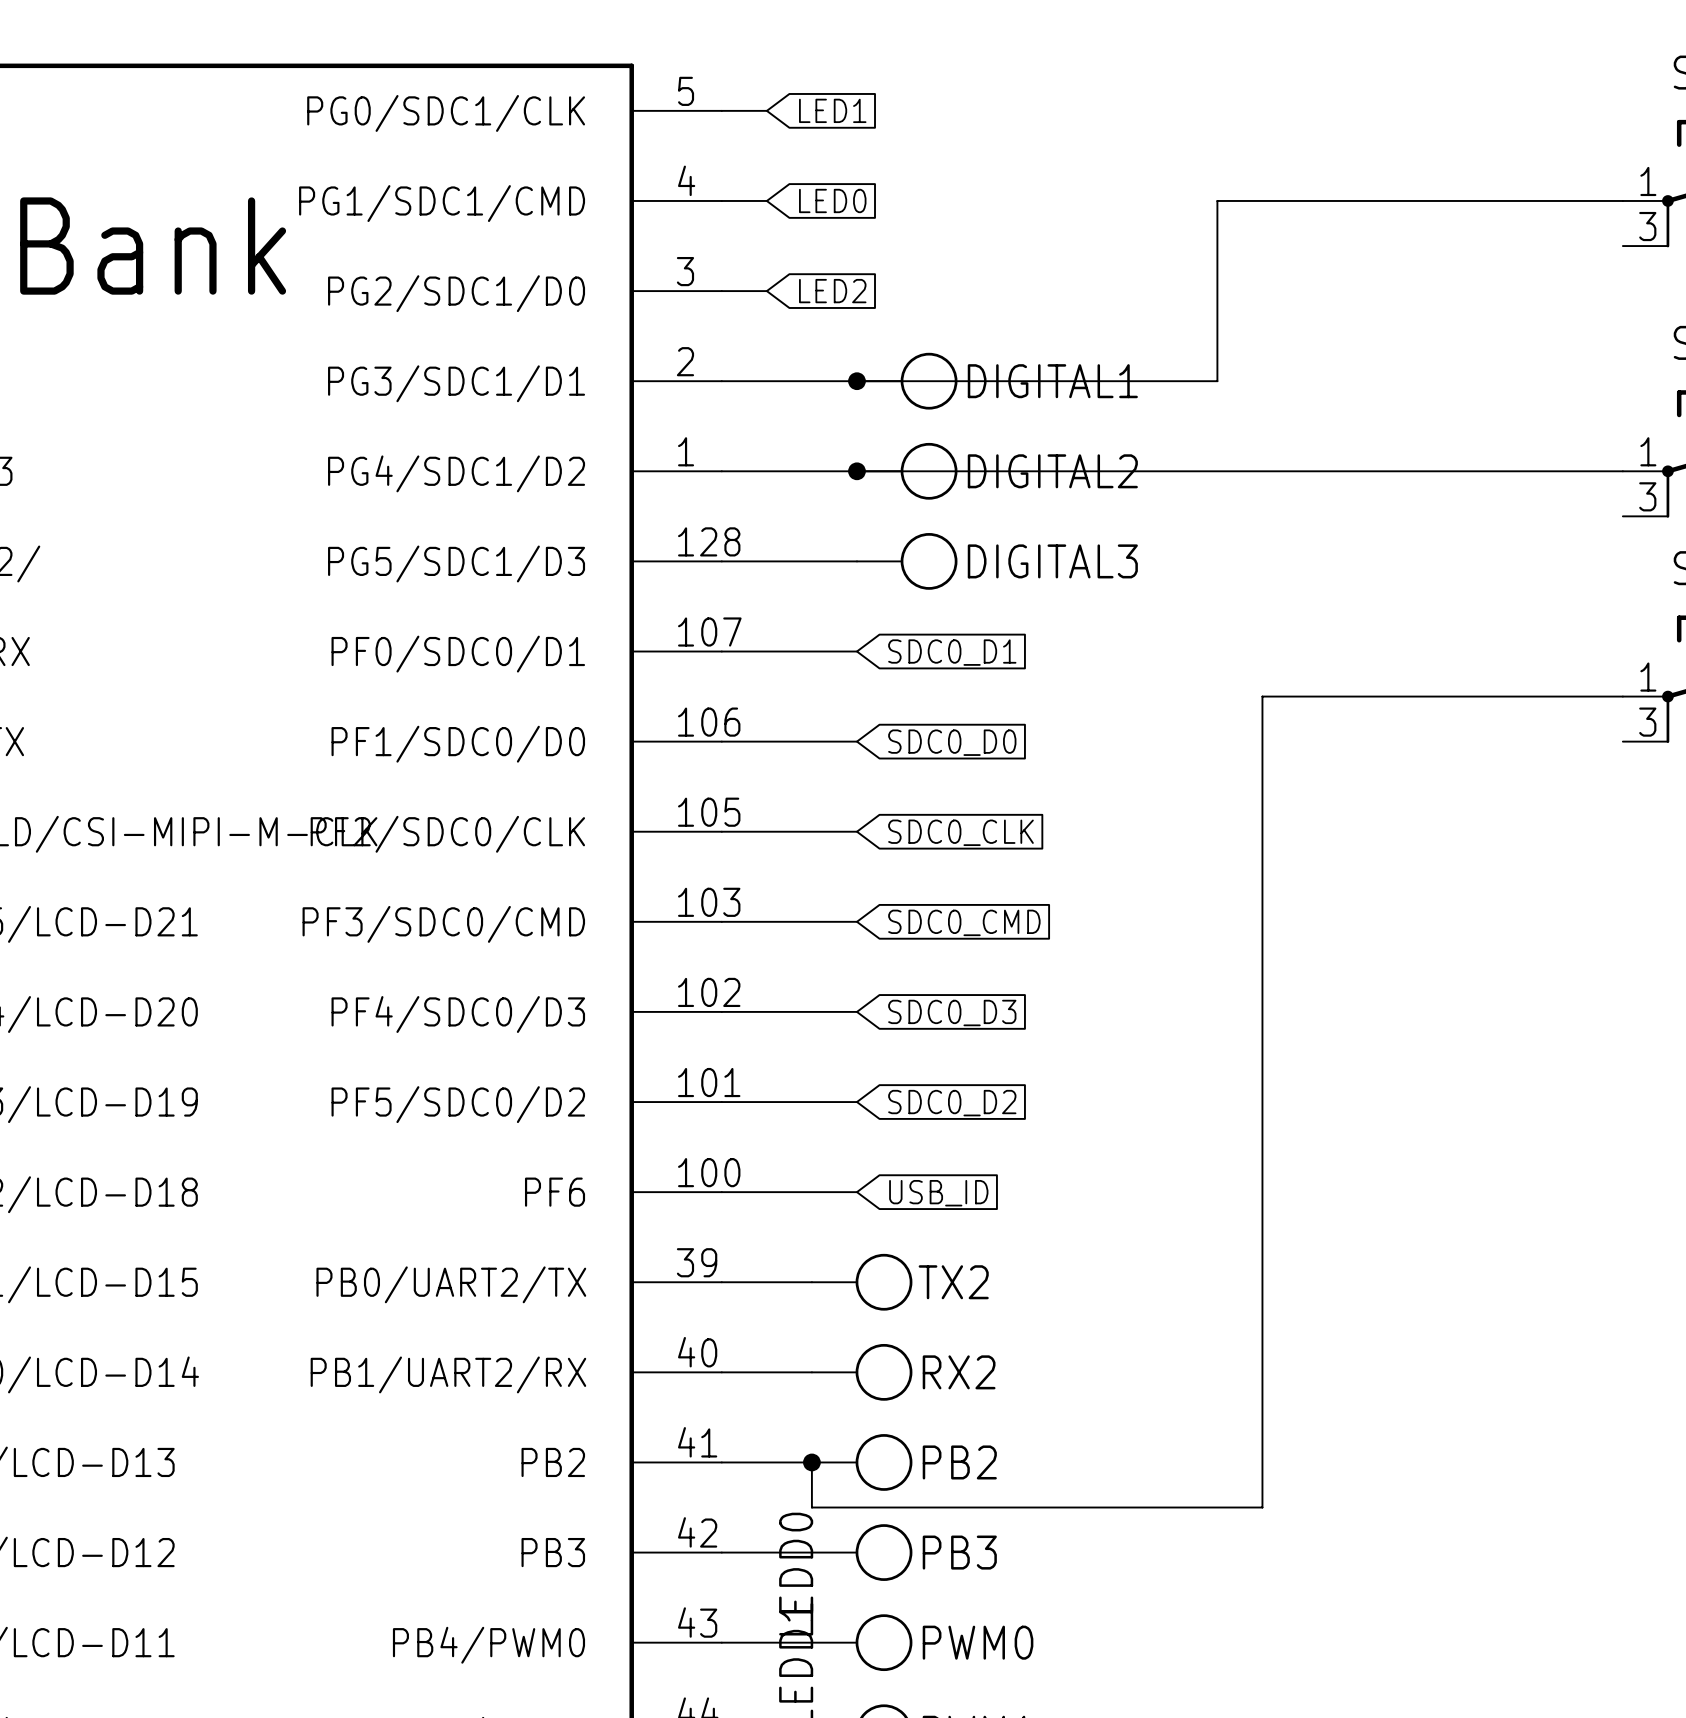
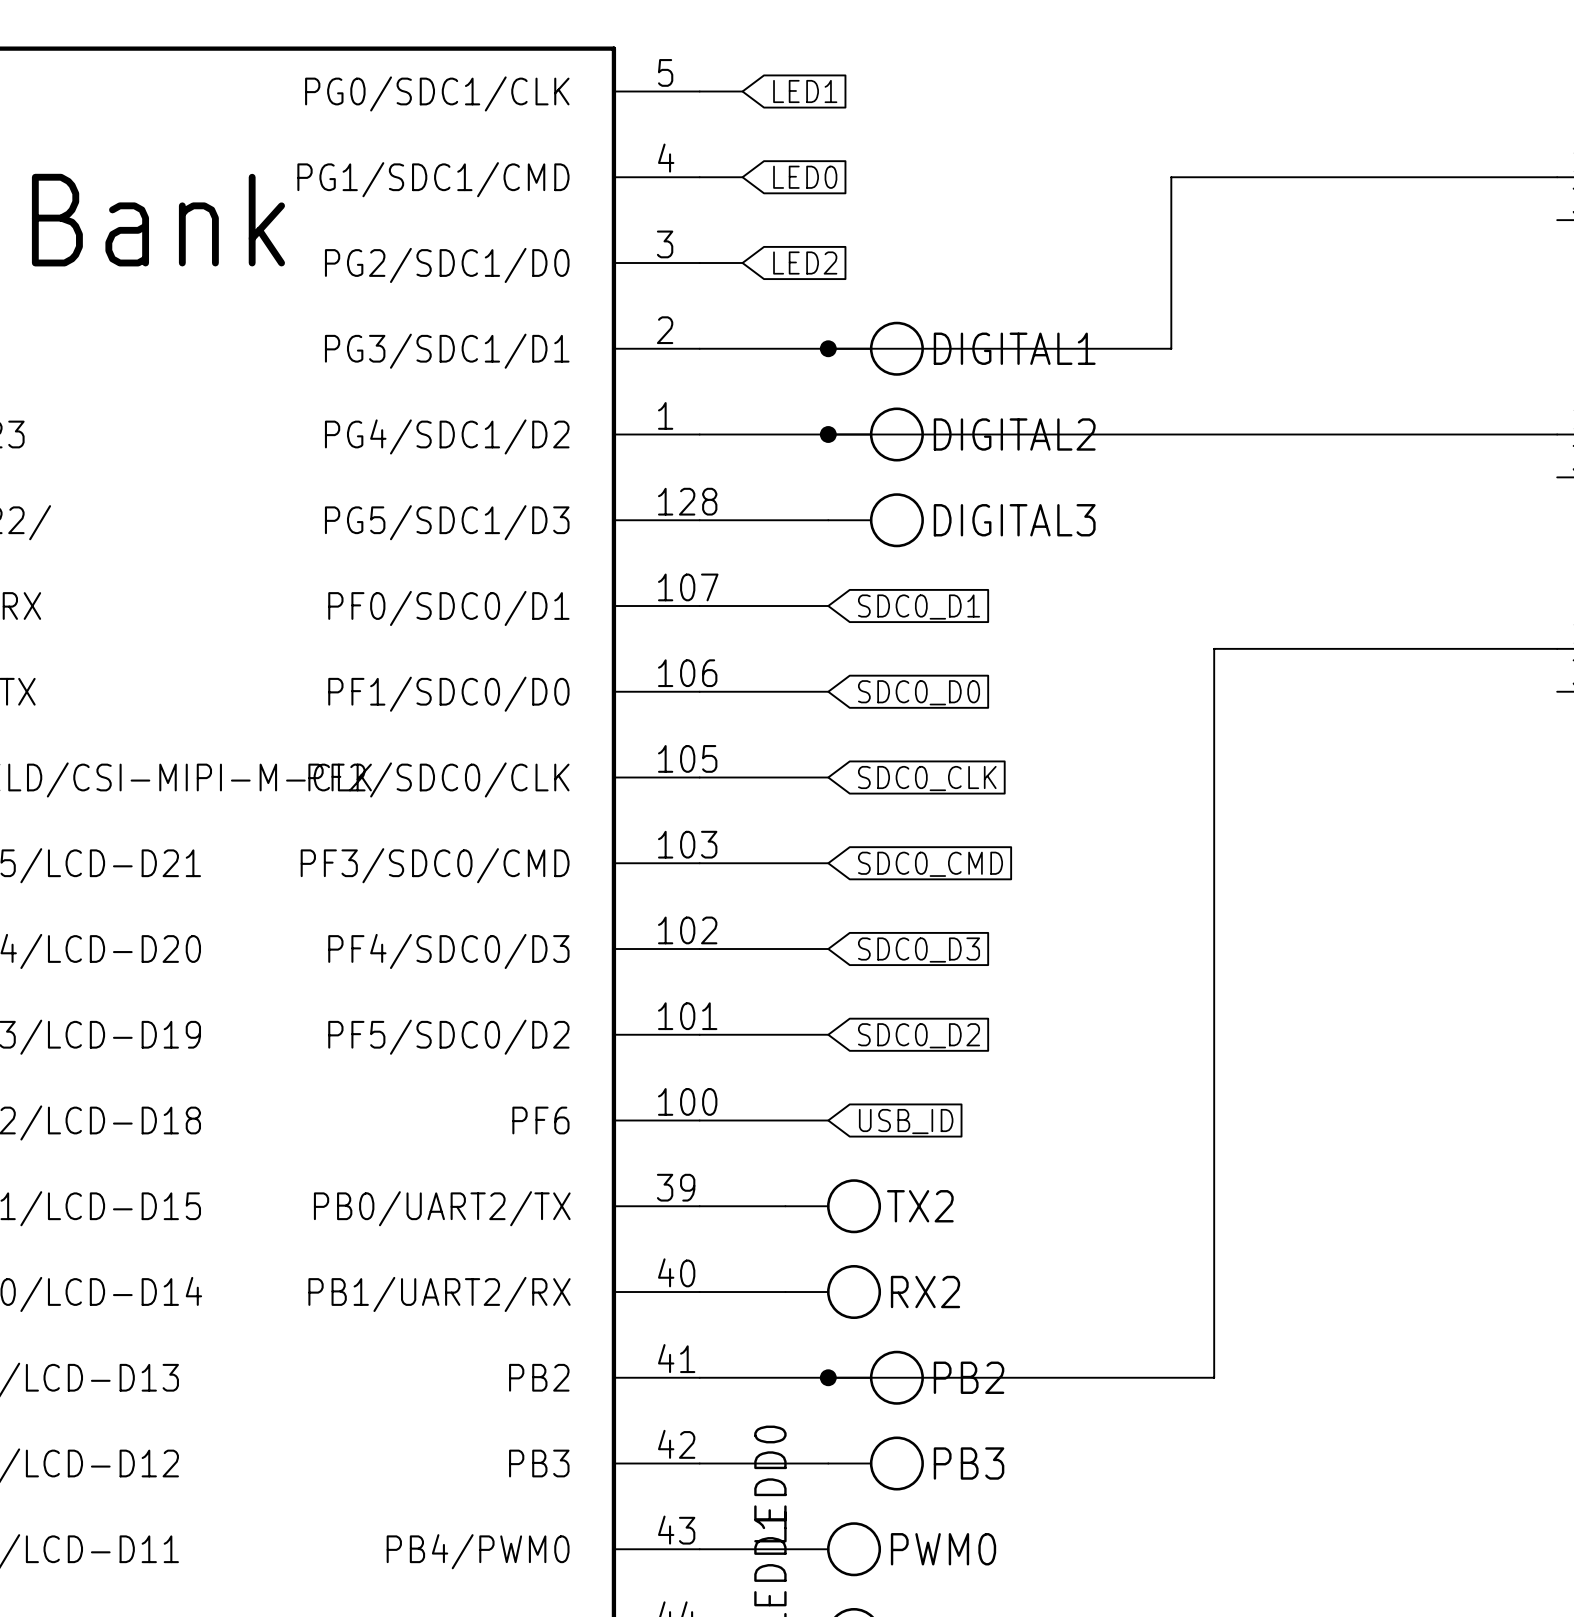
wire: (811, 1462) (811, 1507) (1262, 1507) (1262, 1462) -> (785, 1377) (1214, 1377)
junction position: (811, 1462) -> (828, 1377)
PB2 position: (862, 1462) -> (876, 1377)
PB3 position: (862, 1552) -> (876, 1463)

